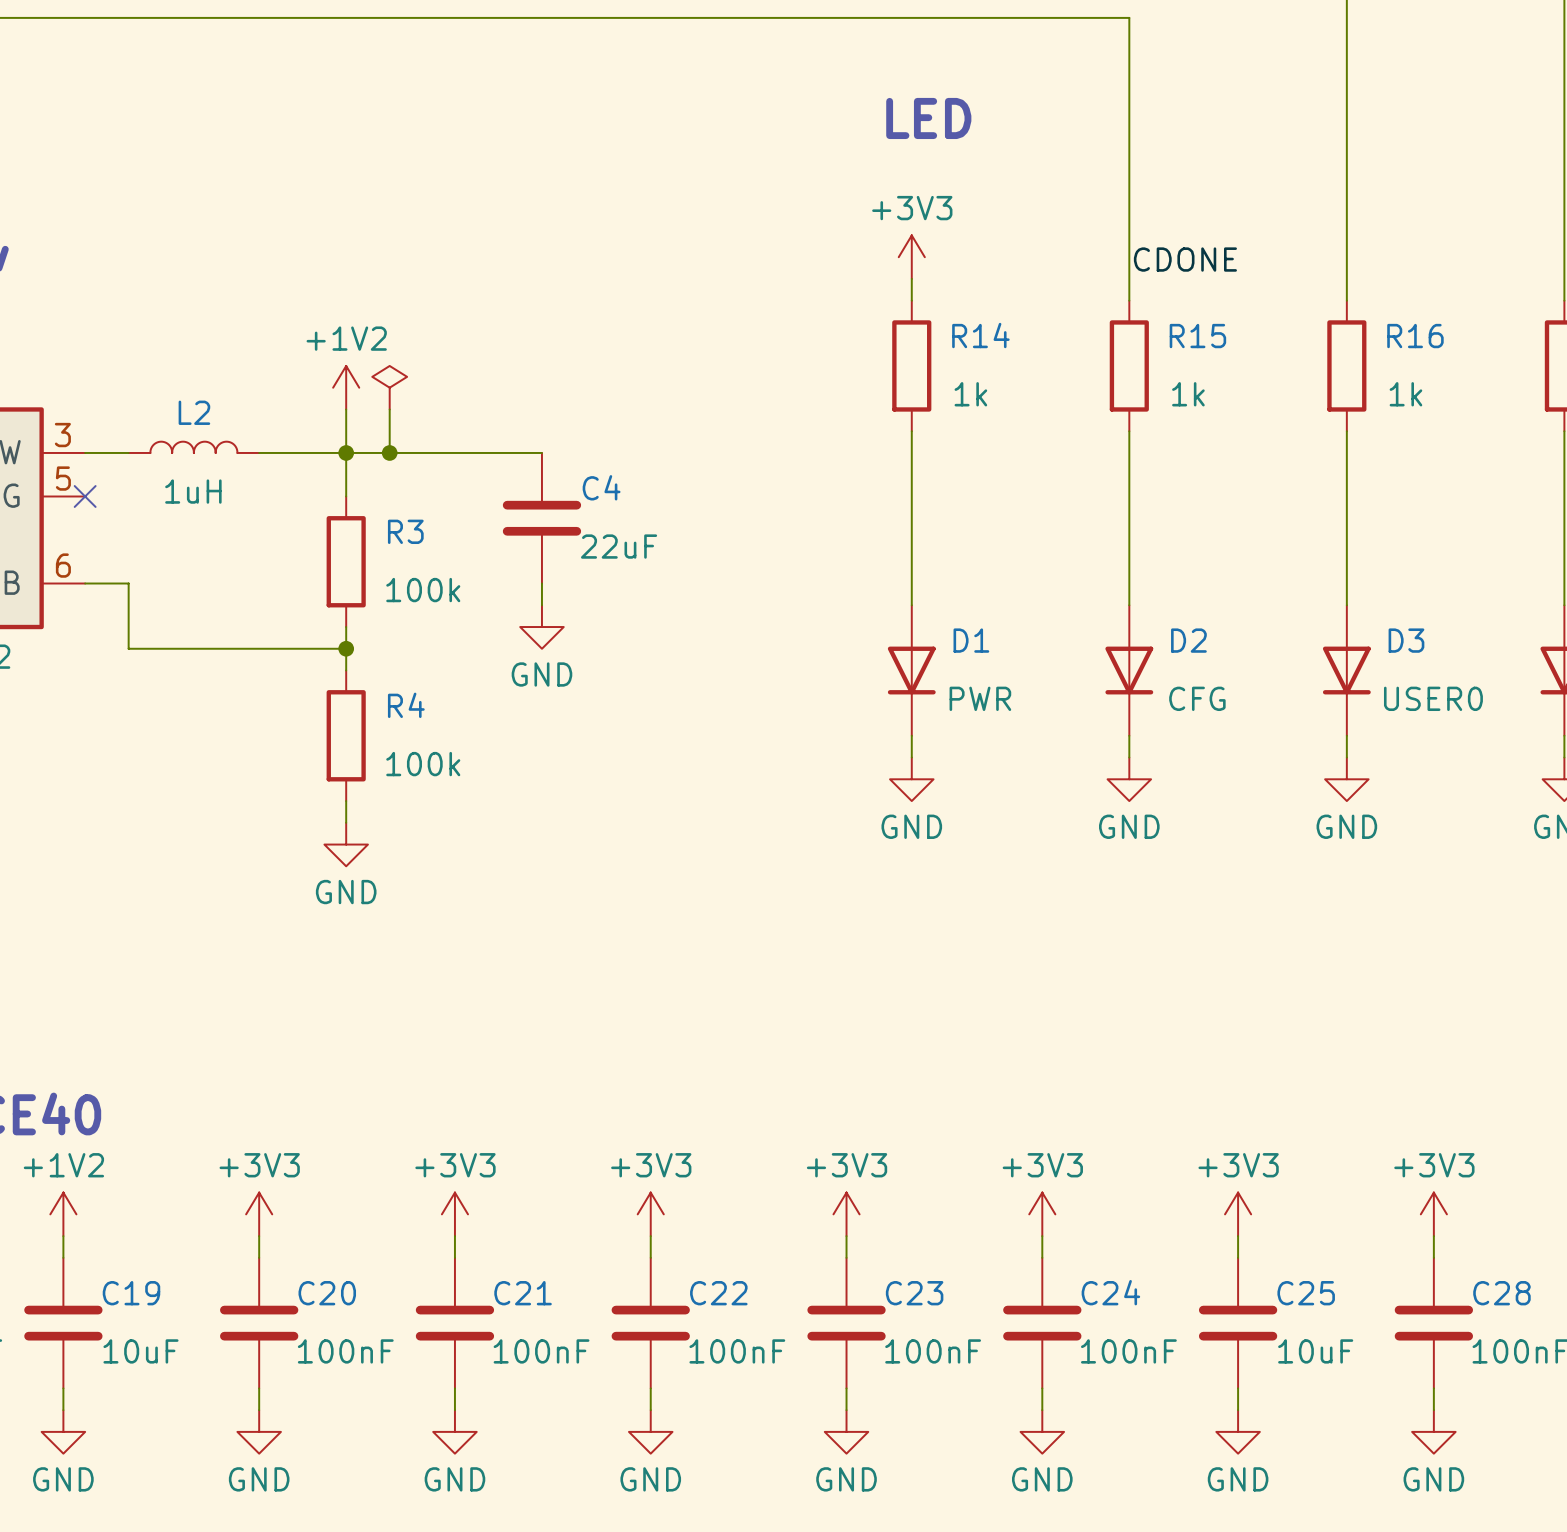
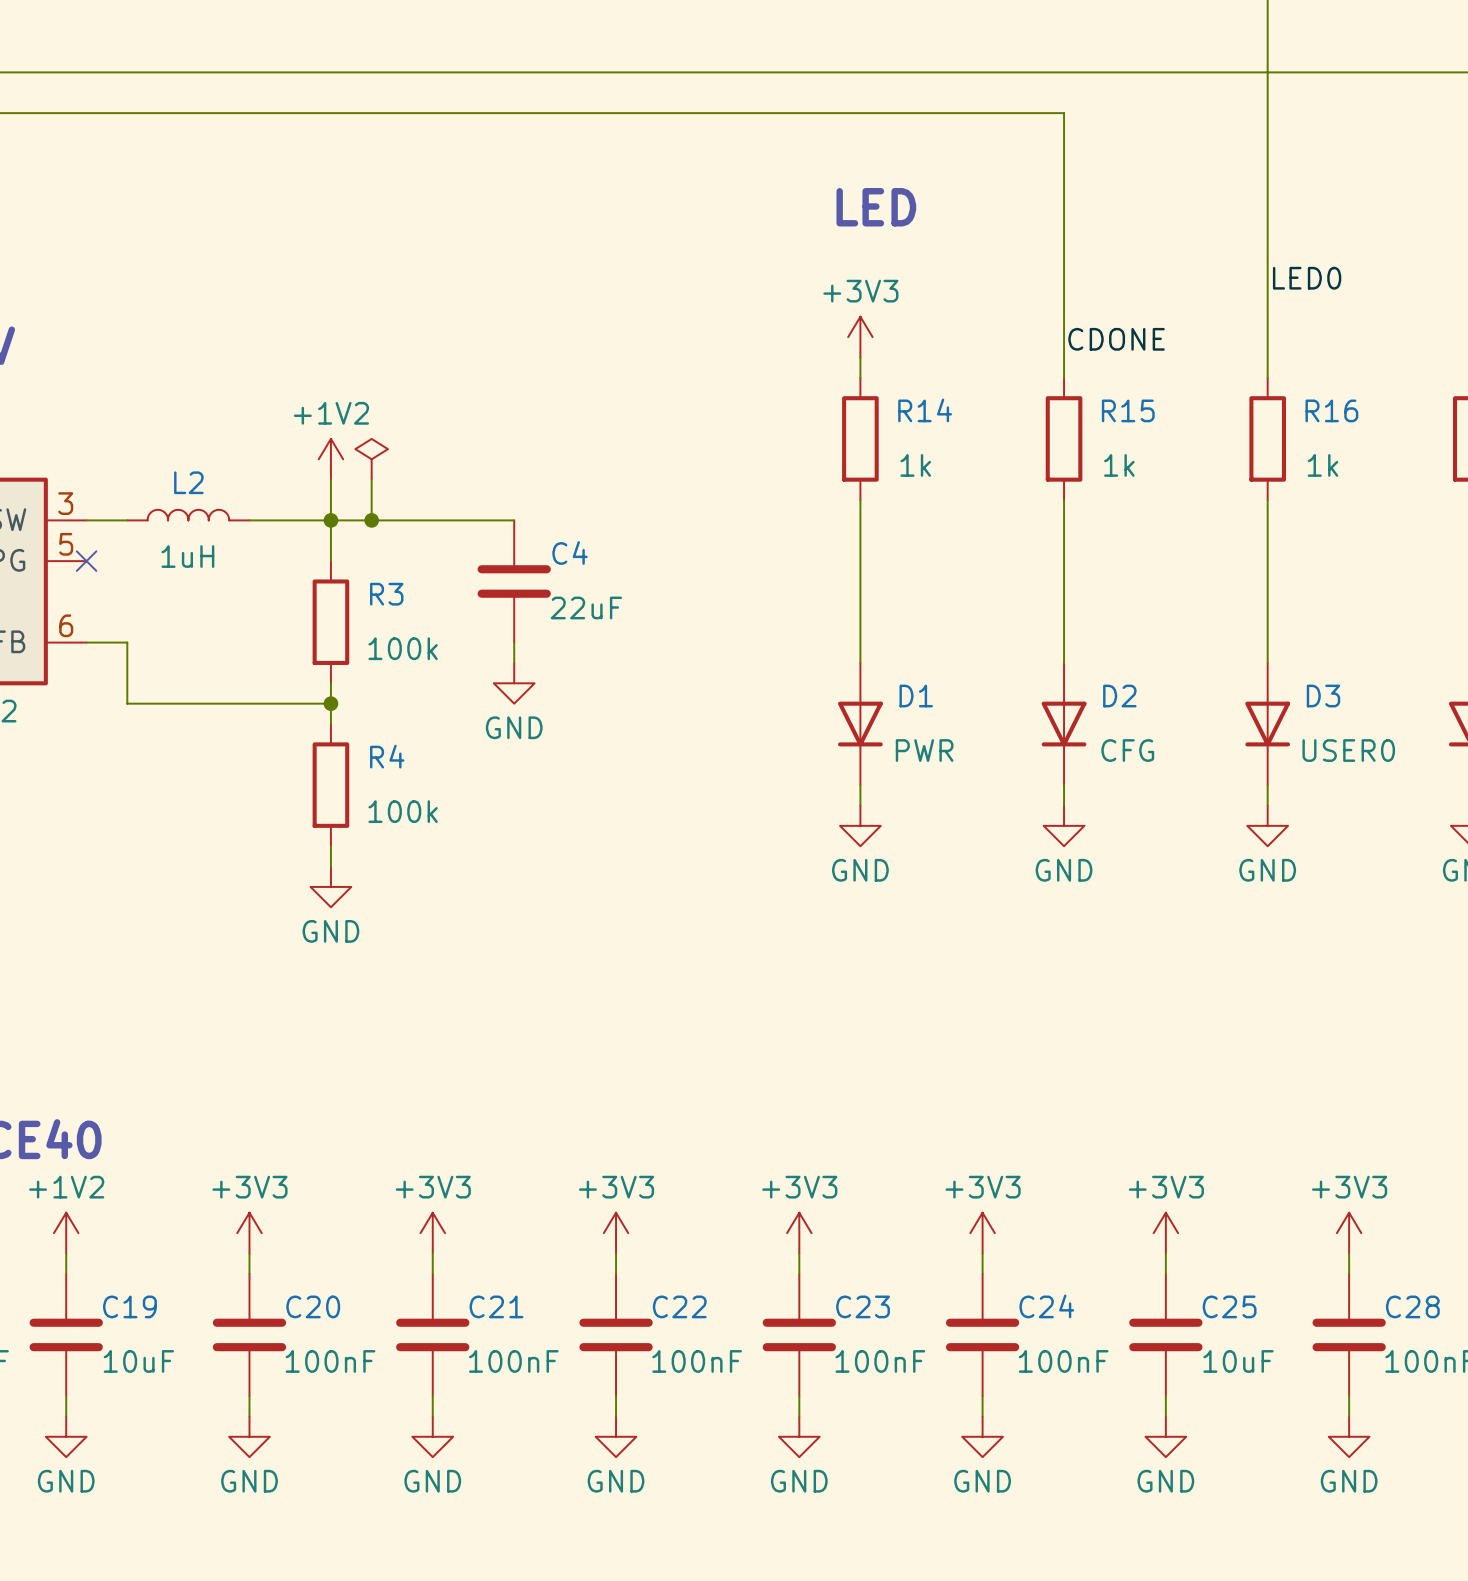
label: none -> LED0 (1307, 278)

